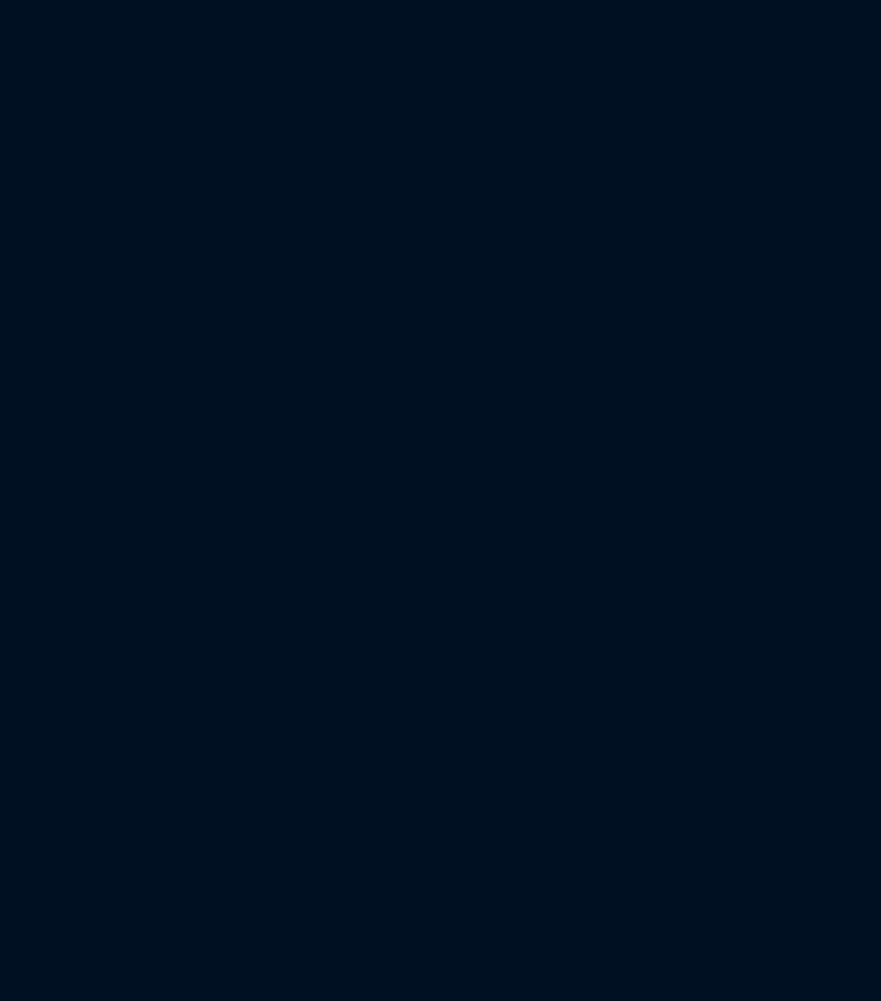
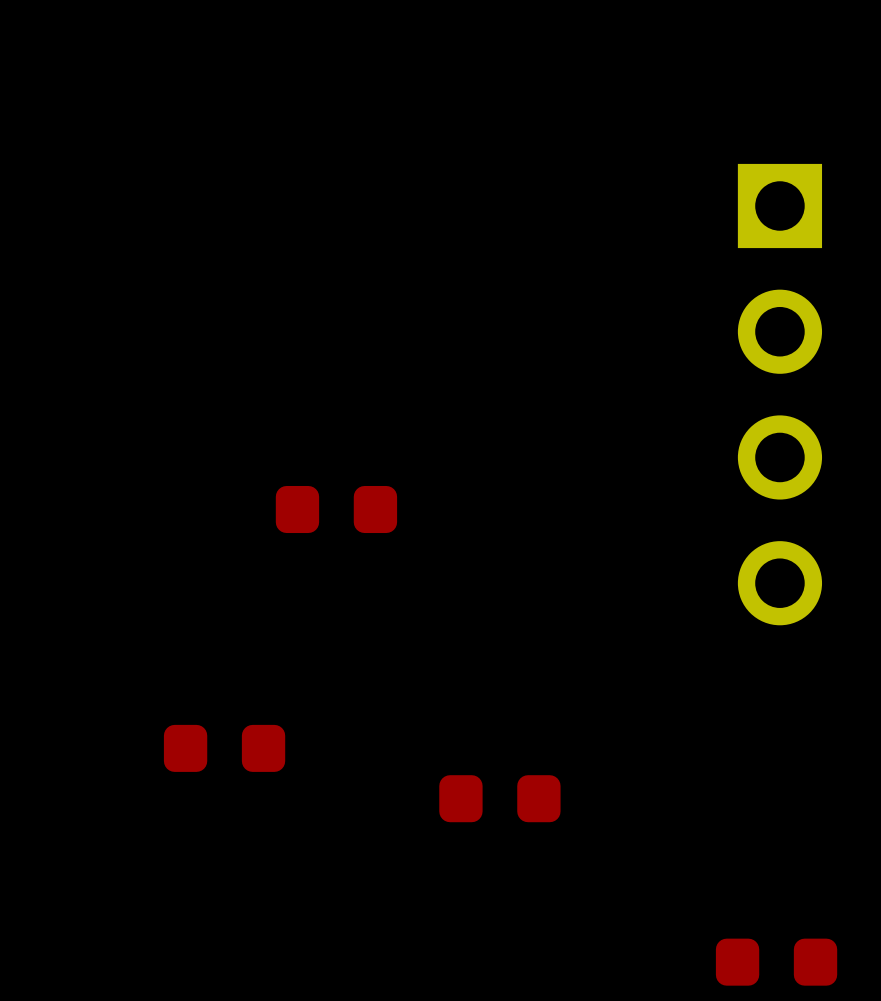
part: none -> (779, 394)
part: none -> (336, 509)
part: none -> (224, 748)
part: none -> (499, 798)
part: none -> (776, 962)

